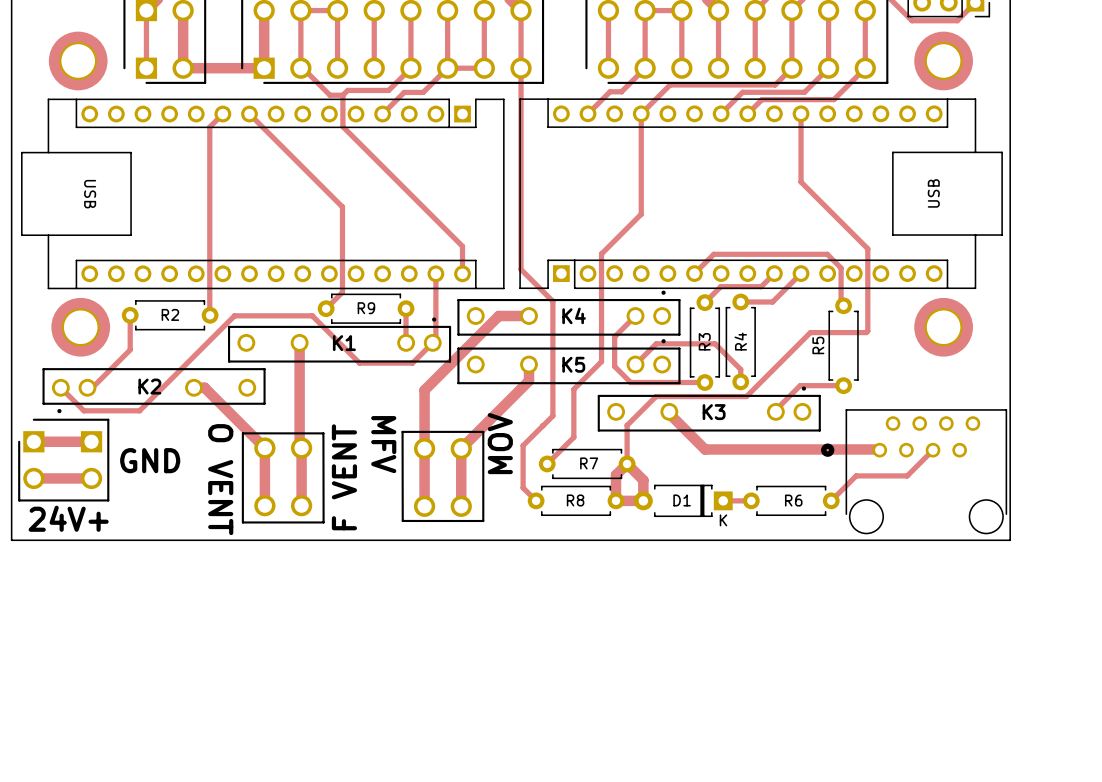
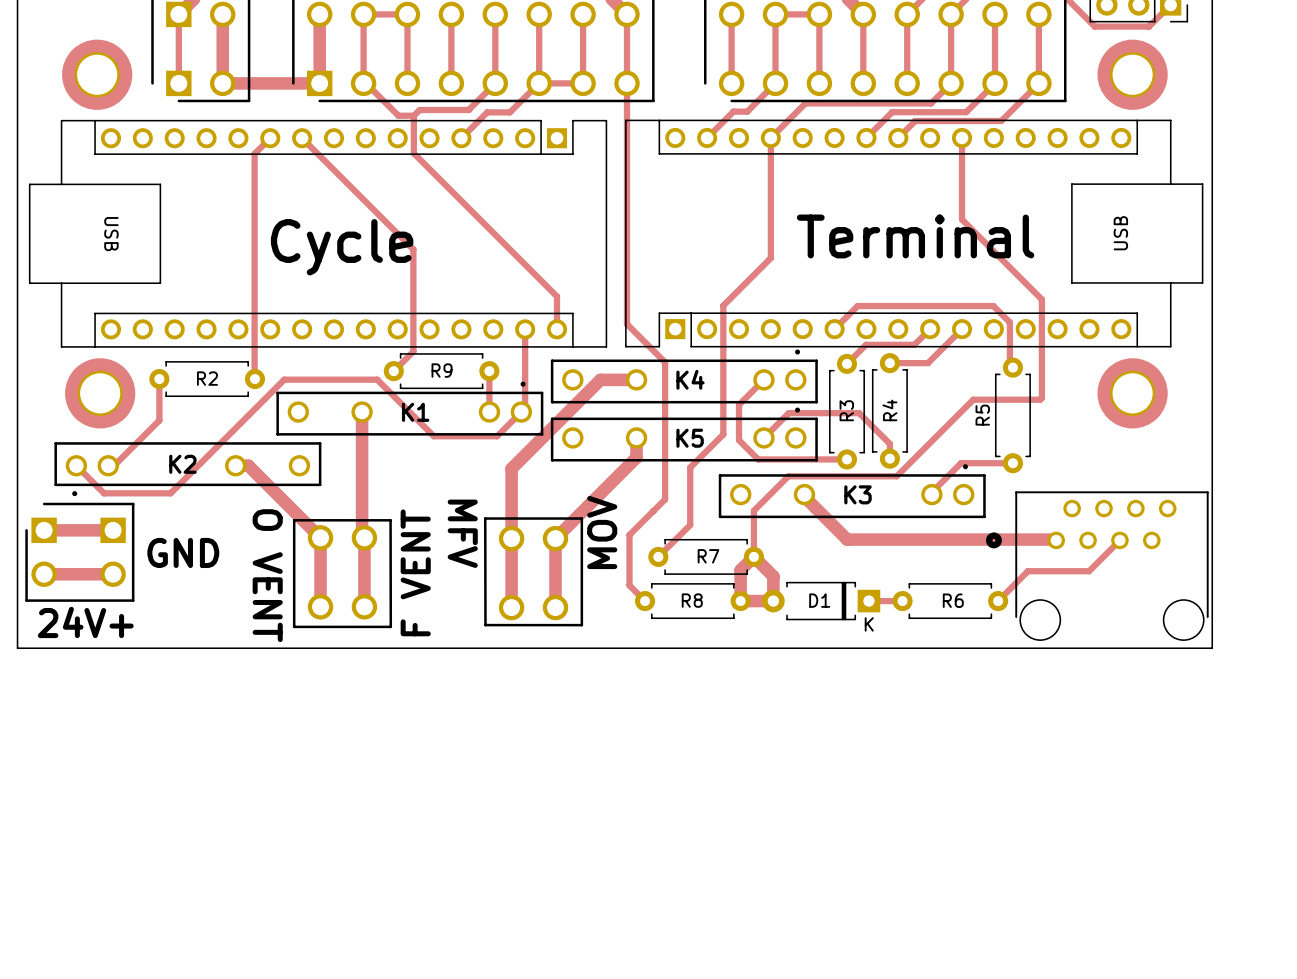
text: none -> Terminal (915, 236)
text: none -> Cycle (342, 247)

